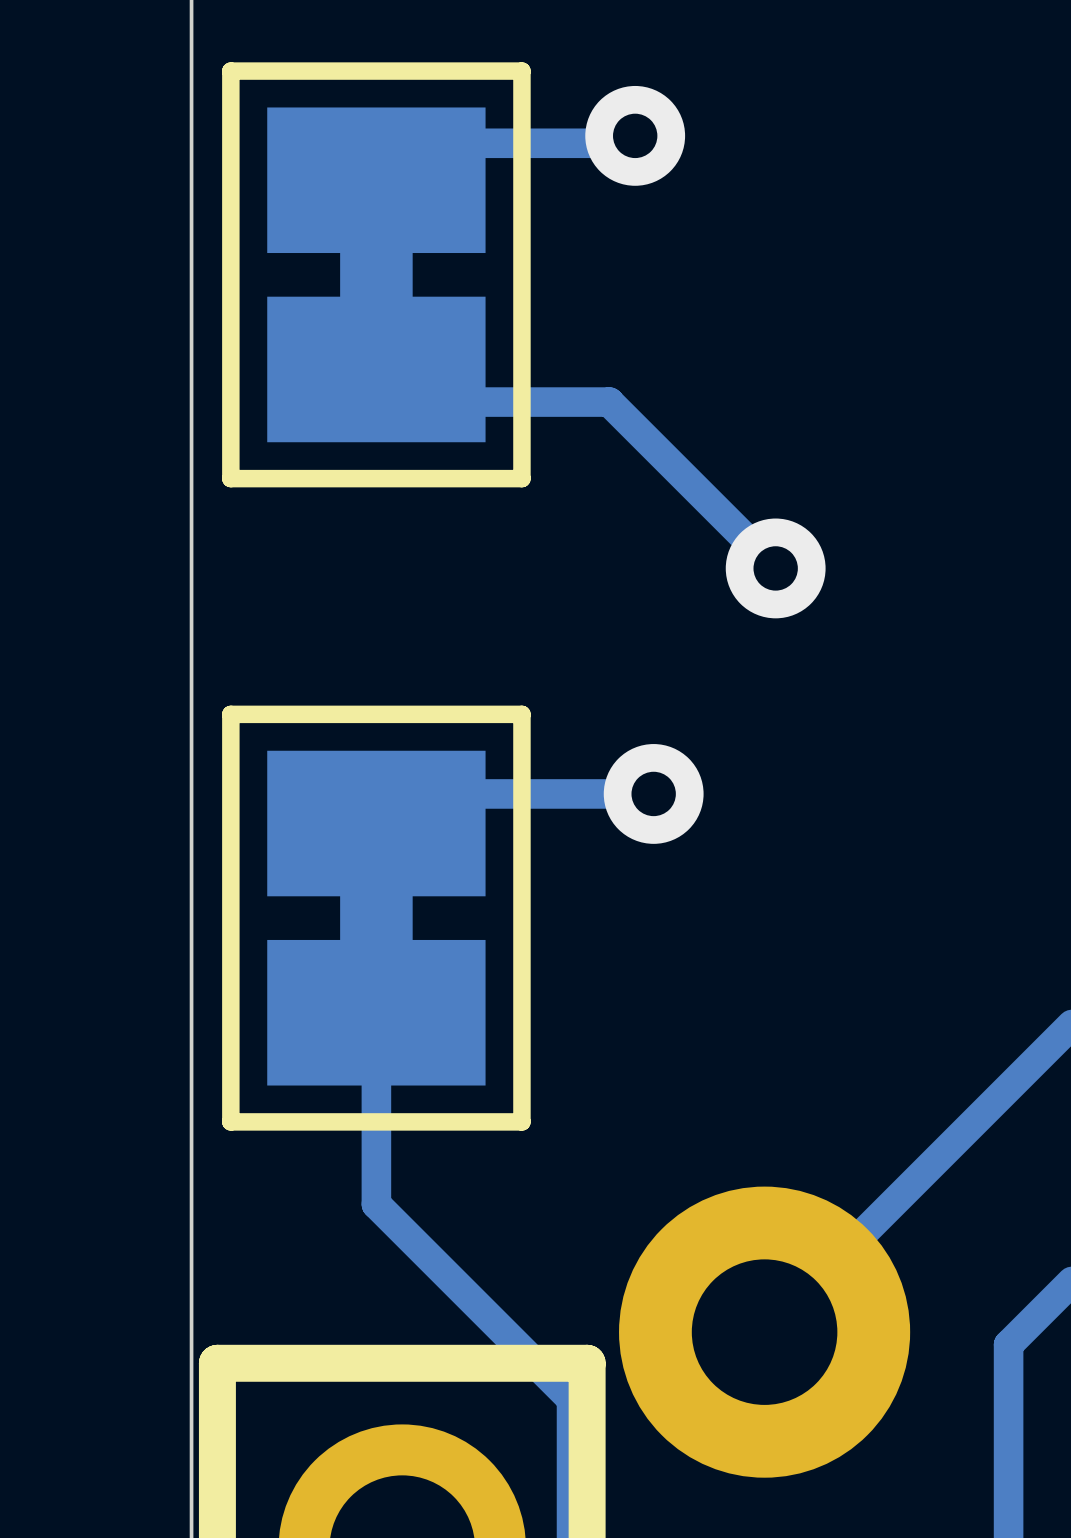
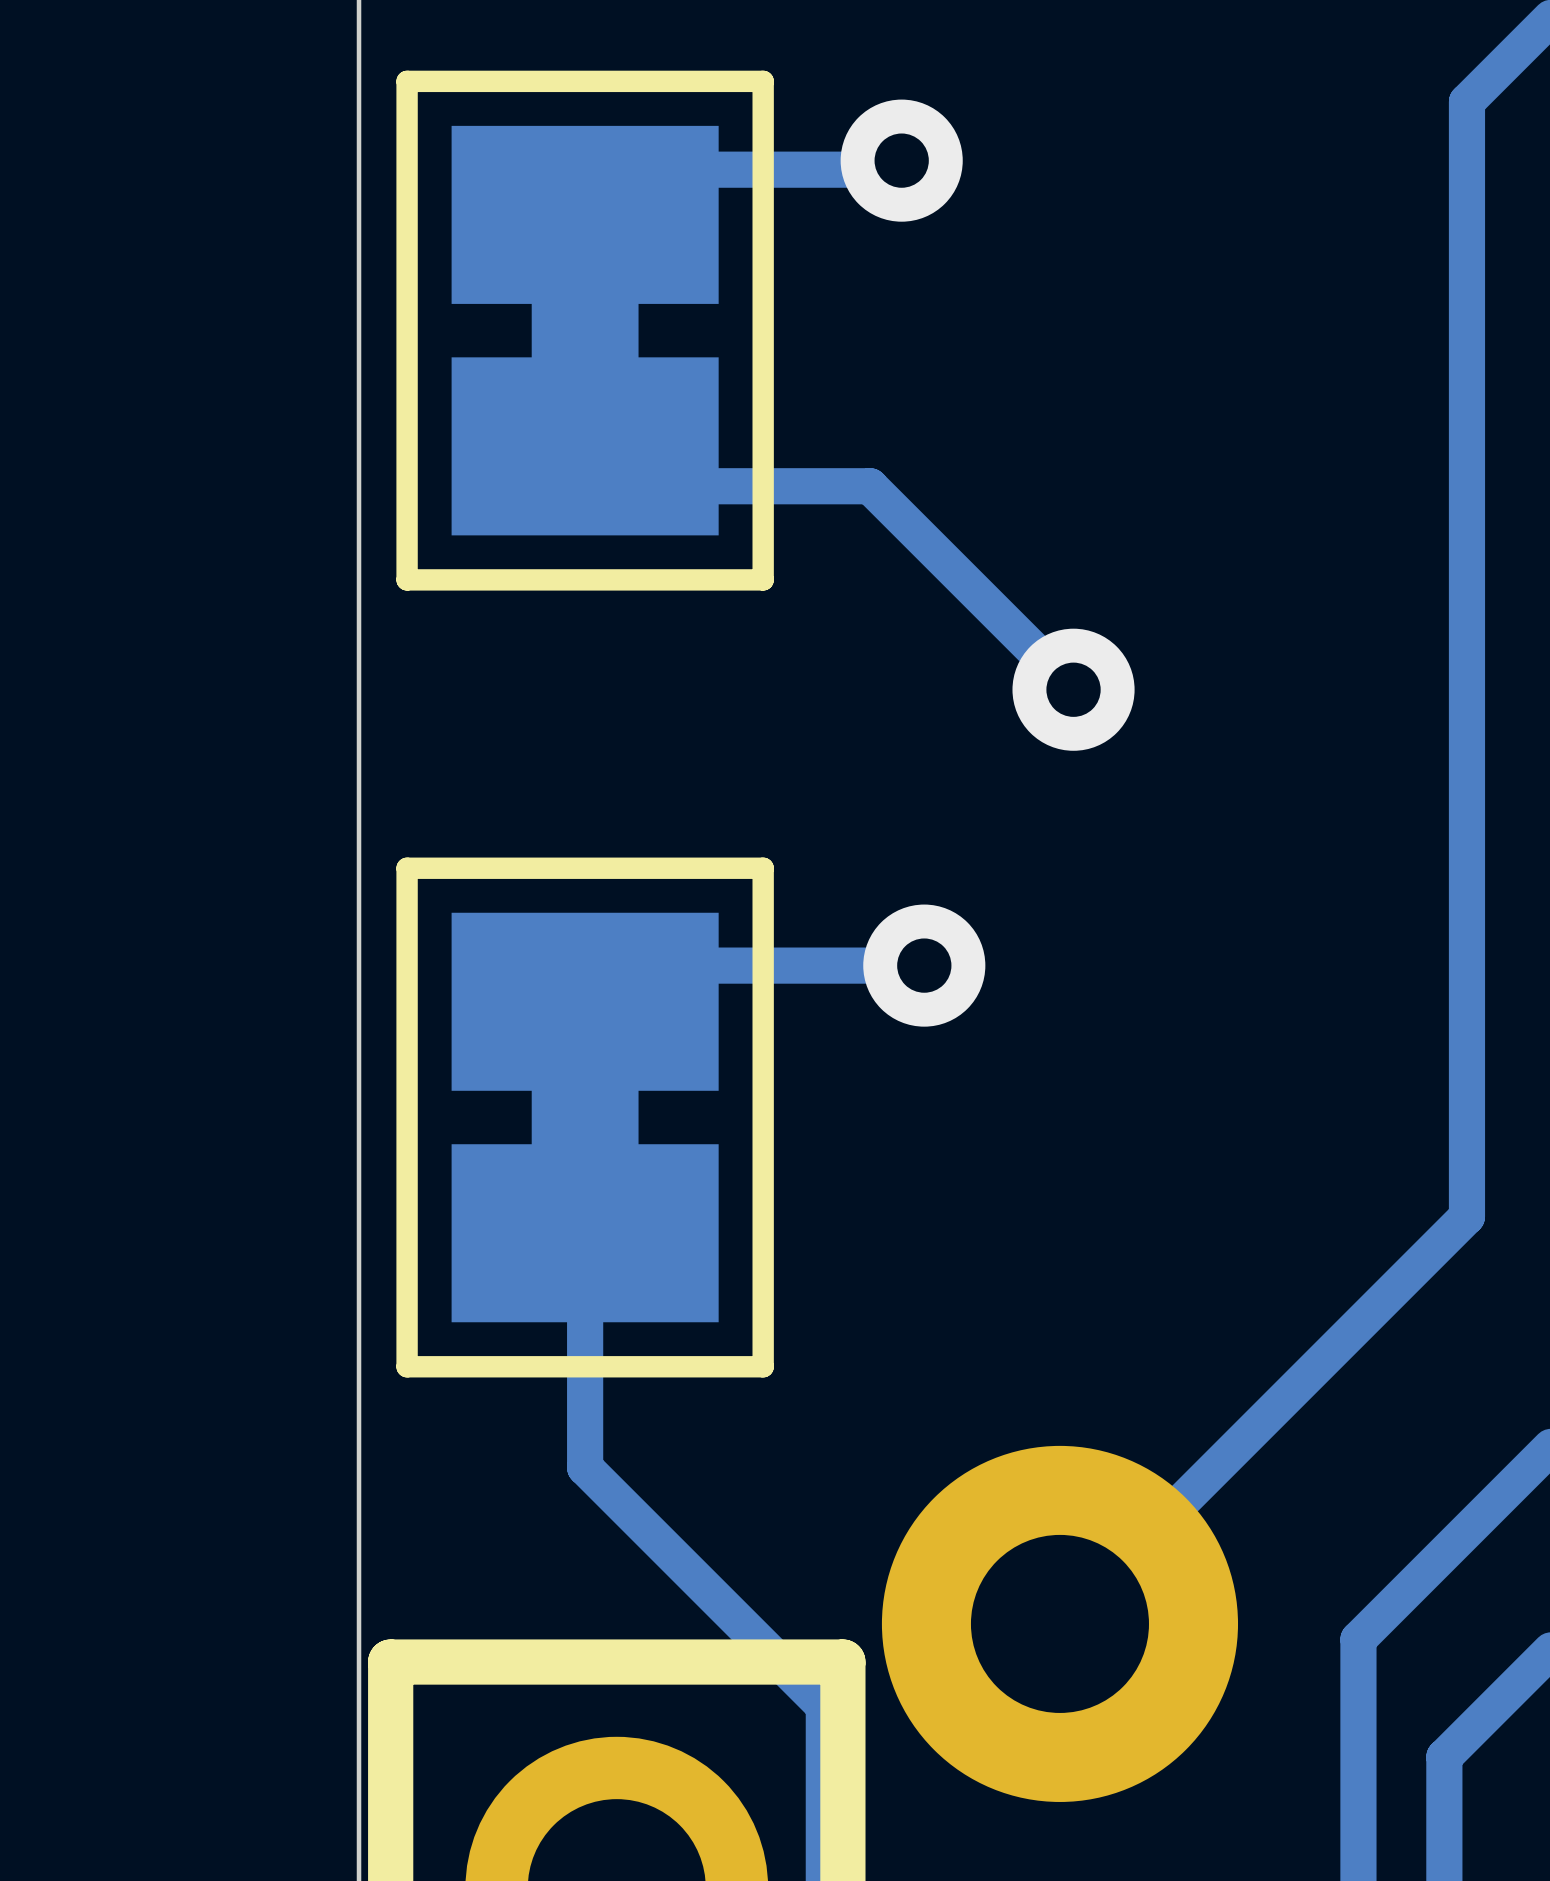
part footprint: [222, 62, 531, 488] -> [396, 70, 774, 591]
part footprint: [222, 705, 531, 1131] -> [396, 857, 774, 1378]

